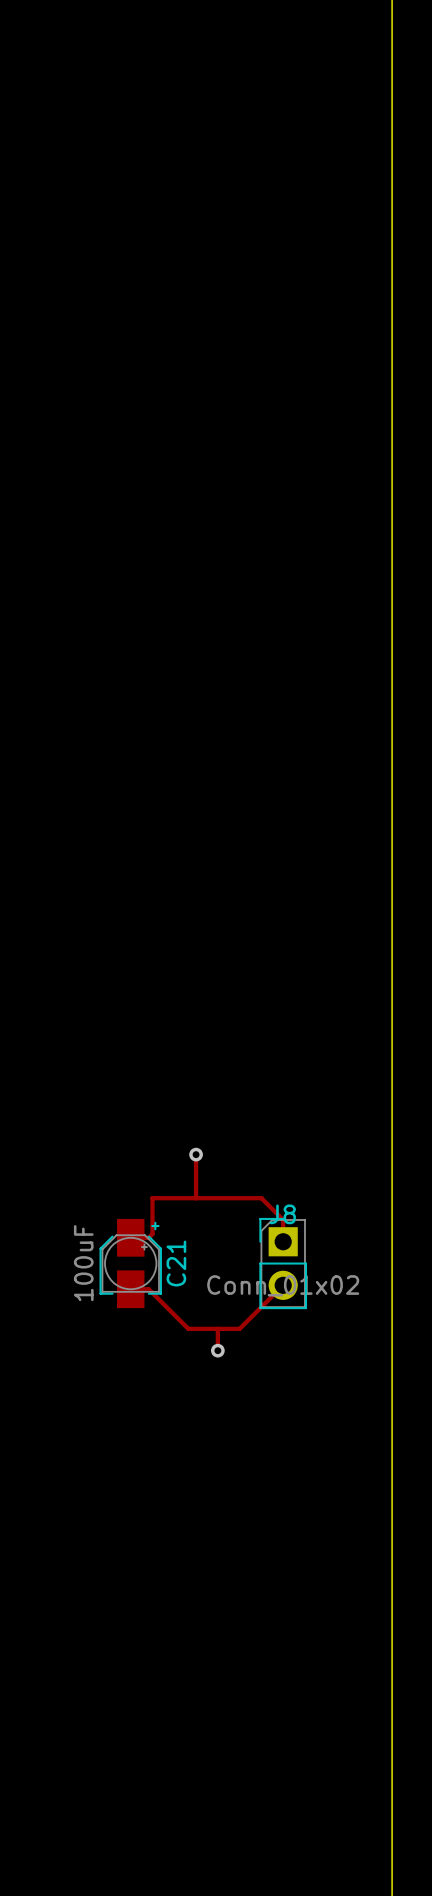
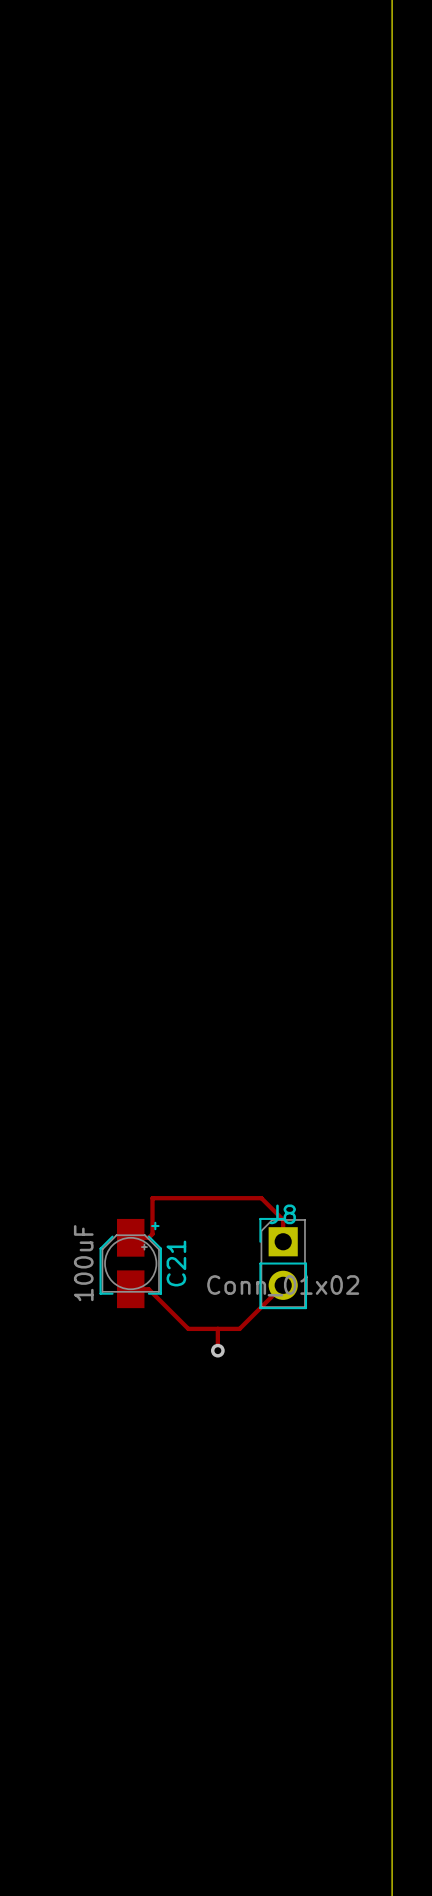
top track: (196, 1154) (196, 1198) -> none
via: (196, 1154) -> none

